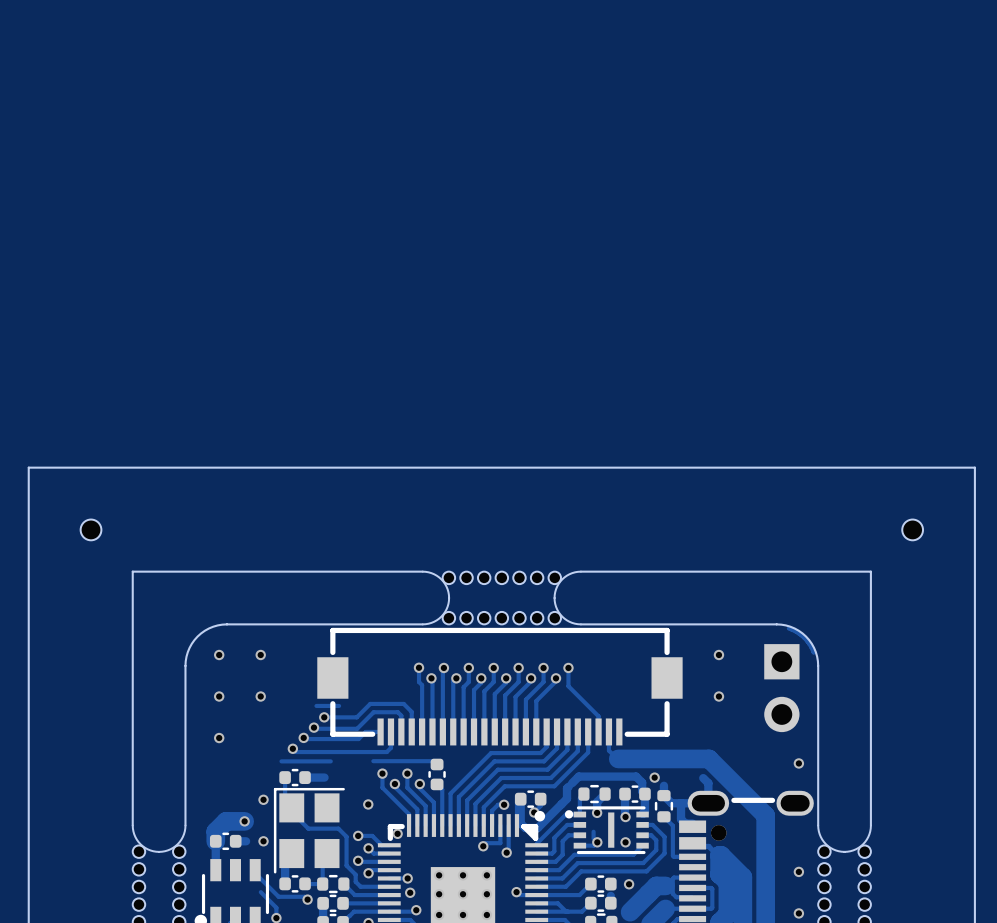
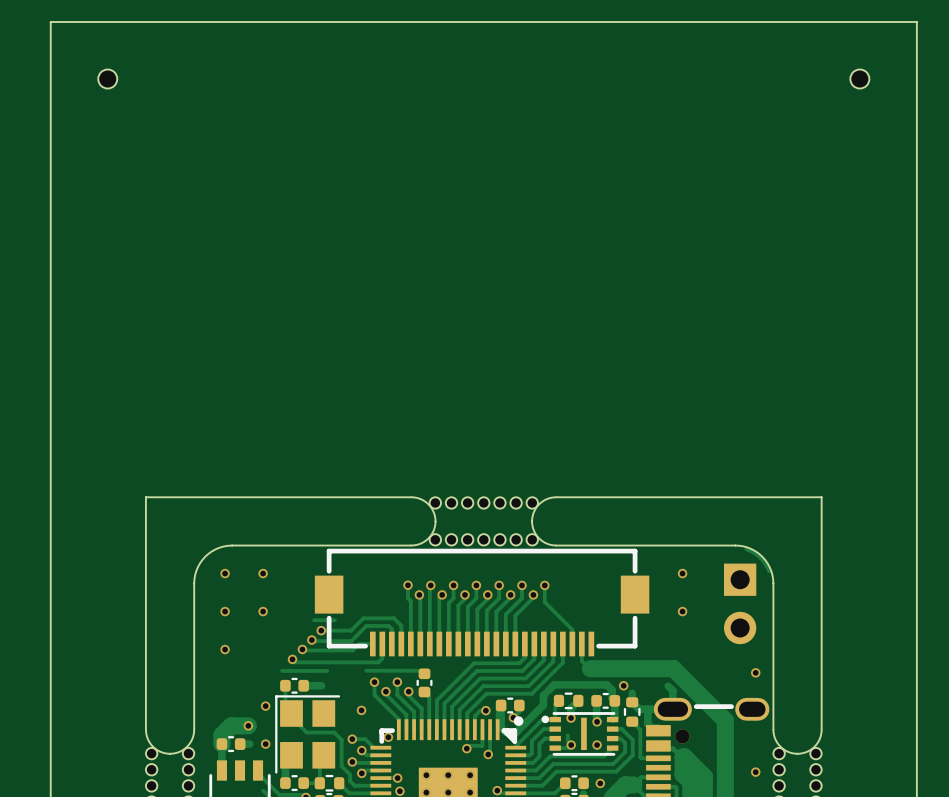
board edge: (28, 467) (974, 467) -> (50, 402) (50, 22) (916, 22) (916, 402)
part position: (91, 529) -> (107, 79)
part position: (912, 529) -> (859, 79)

